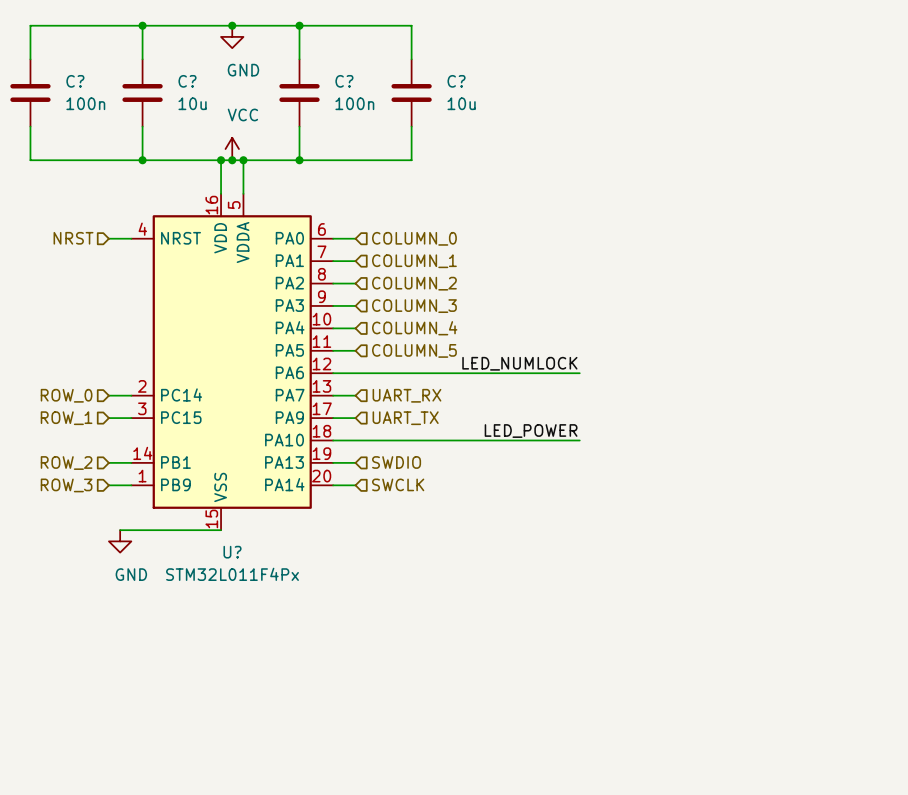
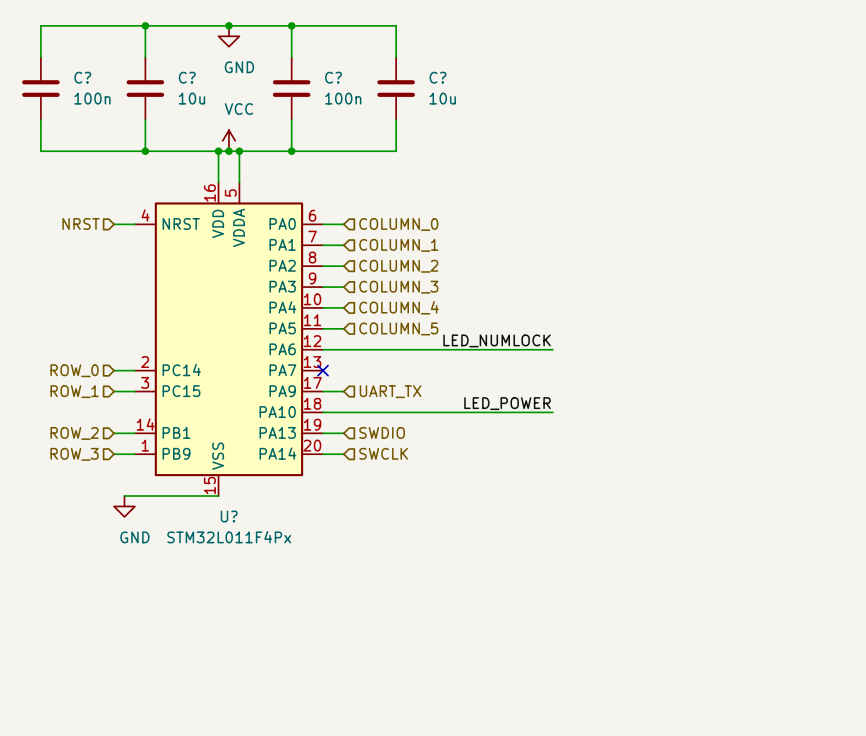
wire: (333, 395) (355, 395) -> none
no-connect mark: none -> (323, 370)
hierarchical label: UART_RX (406, 395) -> none

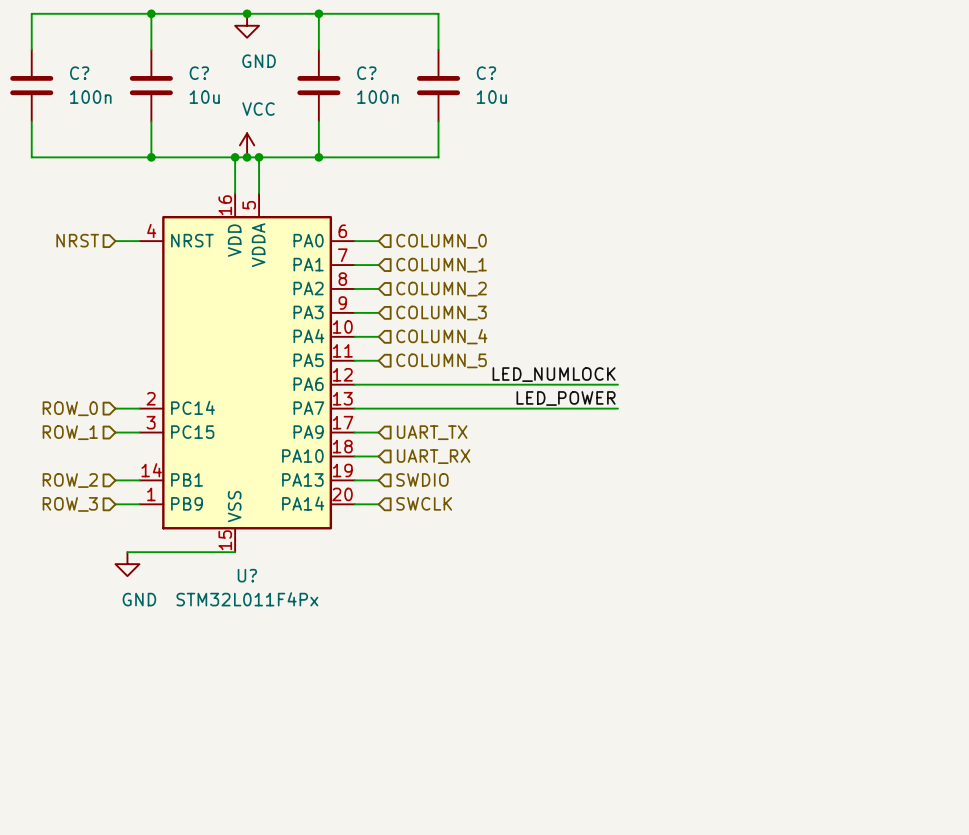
wire: none -> (354, 408) (617, 408)
no-connect mark: (323, 370) -> none
label position: LED_POWER (507, 403) -> LED_POWER (566, 398)
wire: (343, 412) (552, 412) -> none
hierarchical label: none -> UART_RX (433, 456)

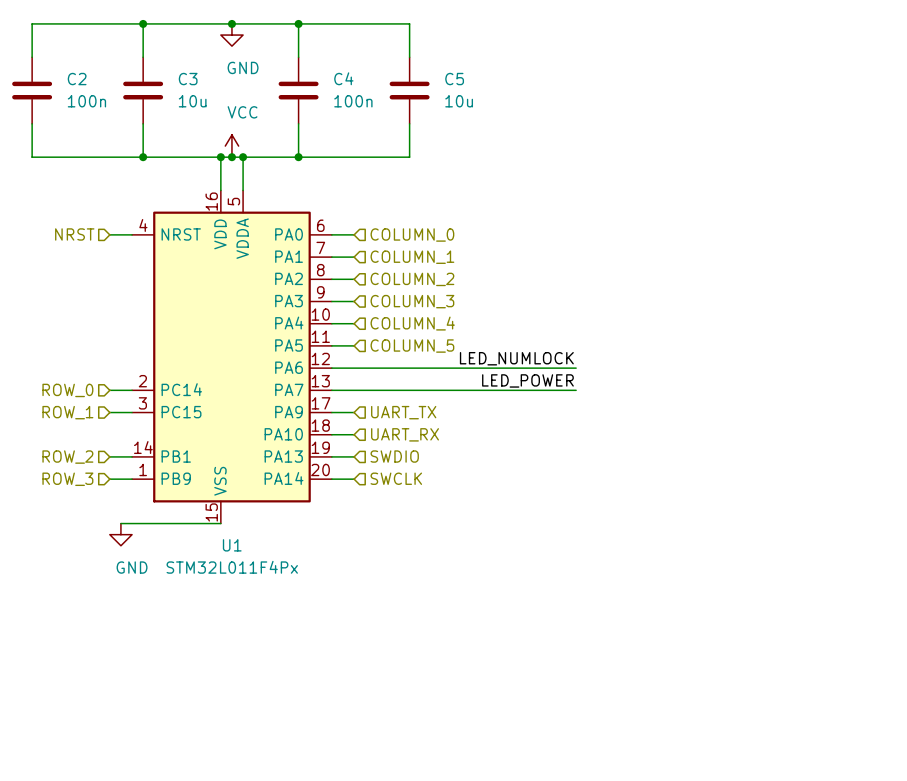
C? name: C? (79, 73) -> C2 (77, 79)
C? name: C? (199, 73) -> C3 (188, 79)
C? name: C? (366, 73) -> C4 (343, 78)
C? name: C? (486, 73) -> C5 (454, 79)
U? name: U? (247, 575) -> U1 (232, 545)

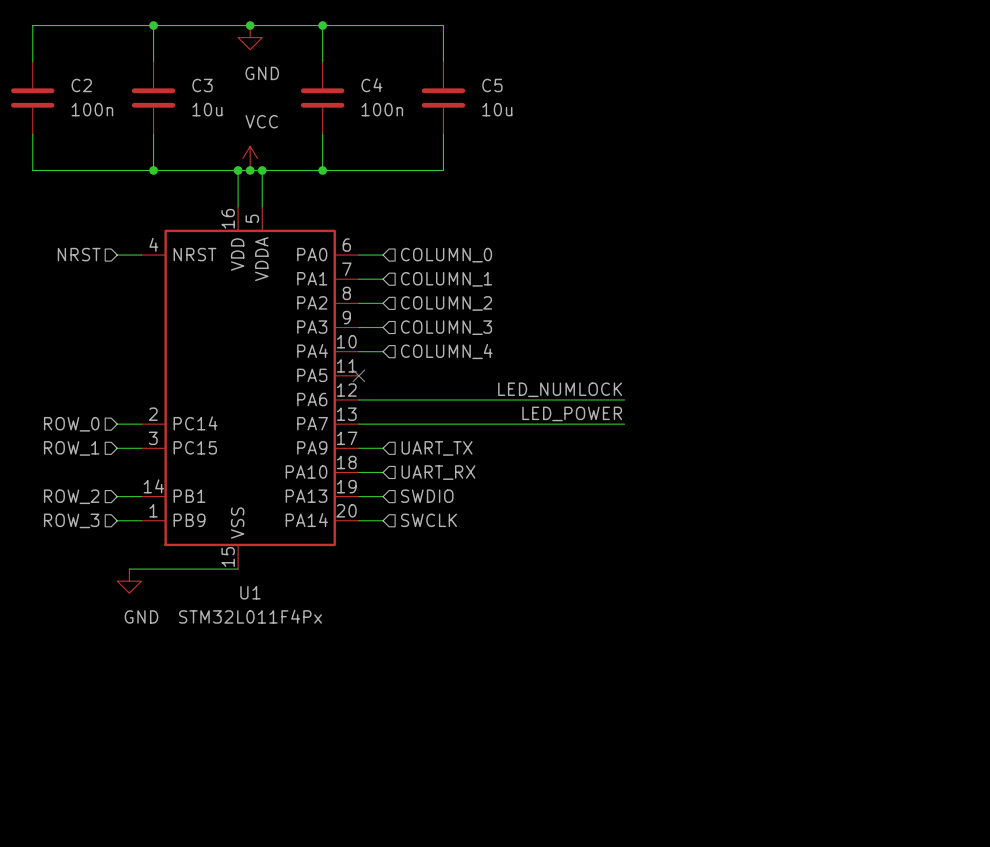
wire: (331, 345) (354, 345) -> none
no-connect mark: none -> (358, 375)
hierarchical label: COLUMN_5 (412, 346) -> none

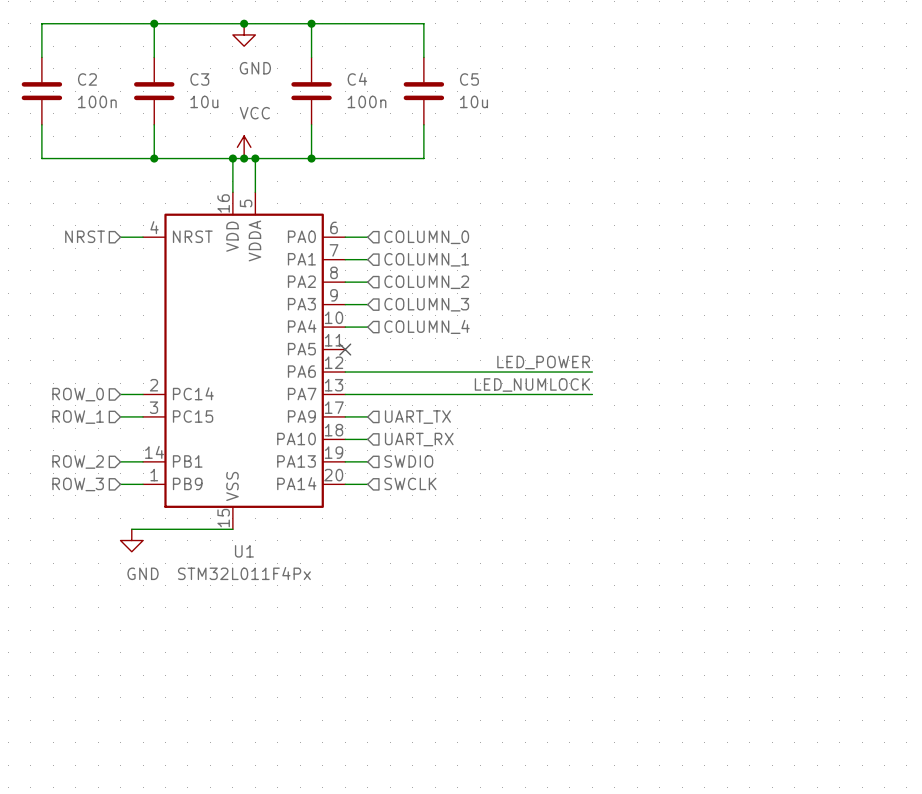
label: LED_NUMLOCK (560, 389) -> LED_POWER (543, 362)
label: LED_POWER (572, 413) -> LED_NUMLOCK (532, 384)

